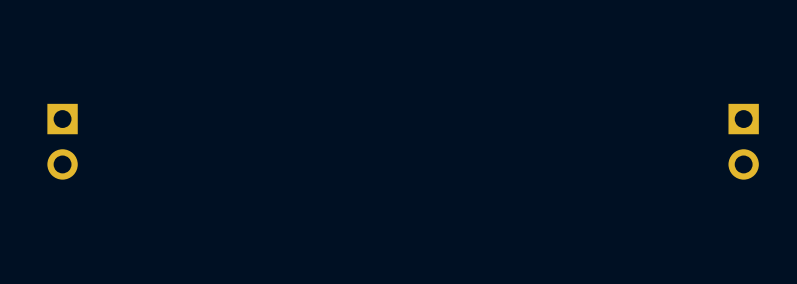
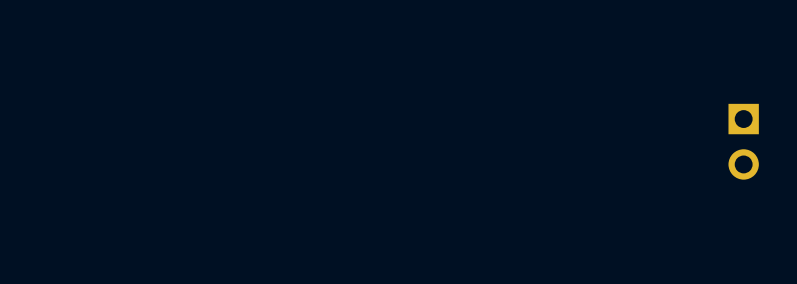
part: (62, 141) -> none

